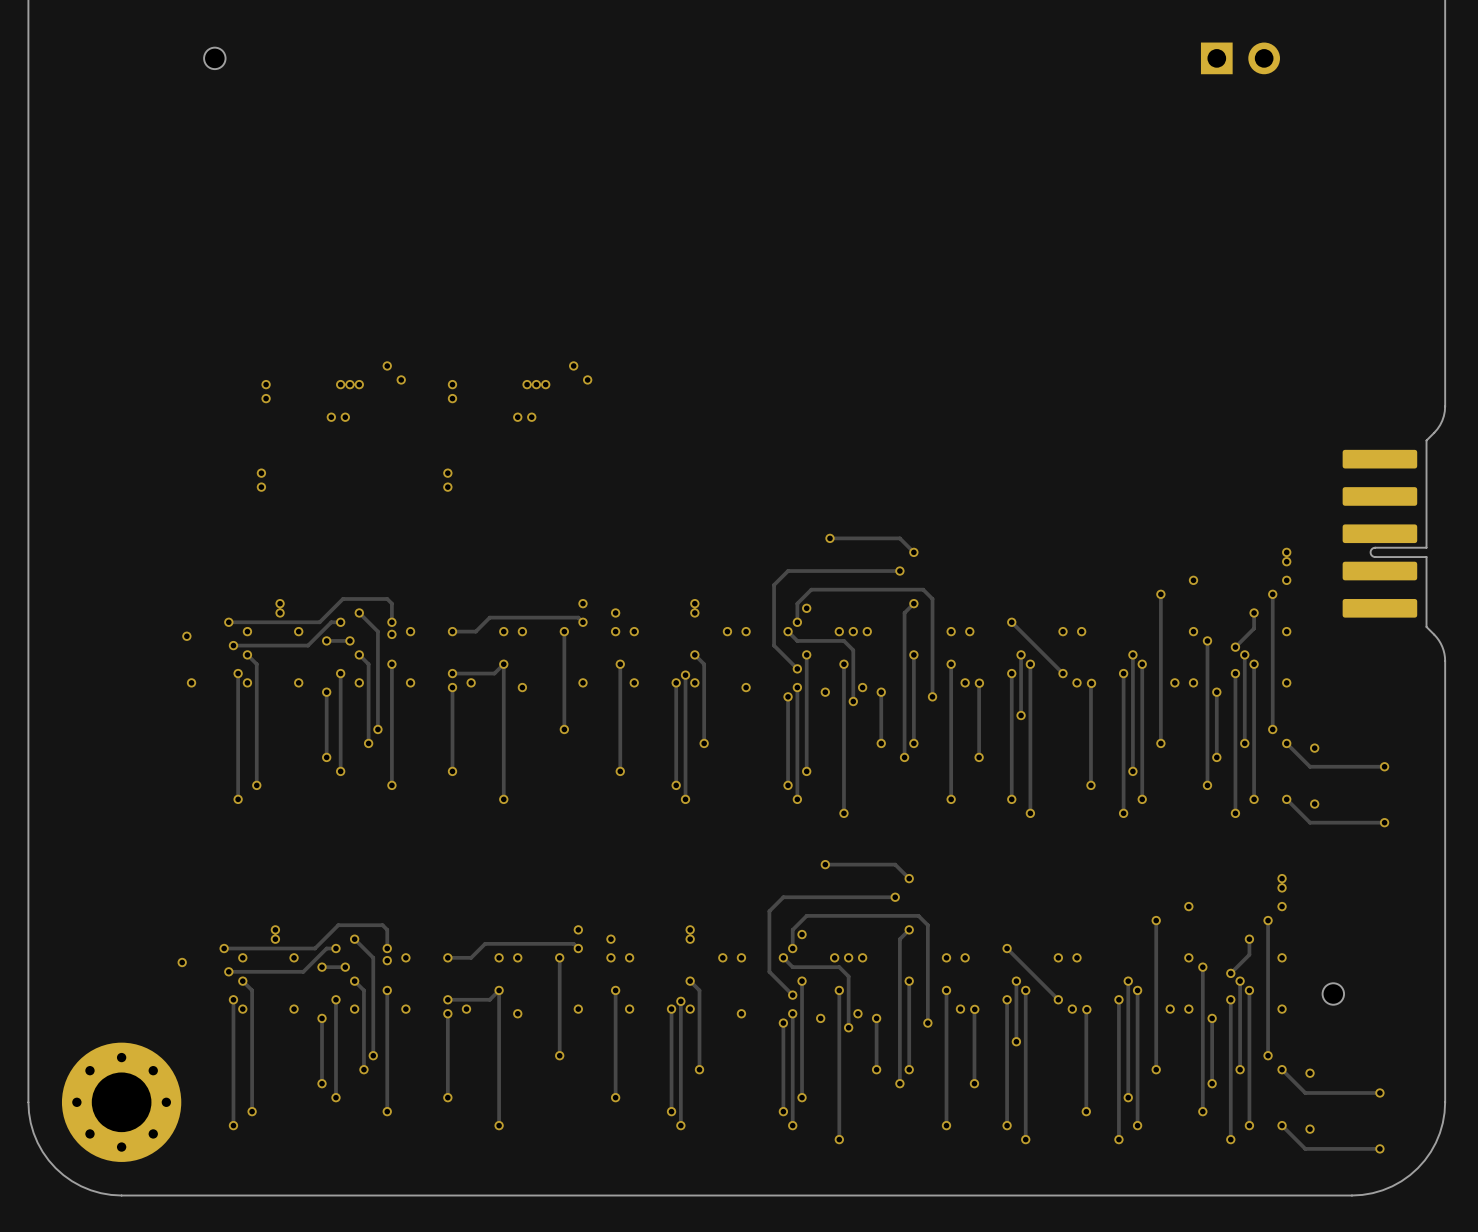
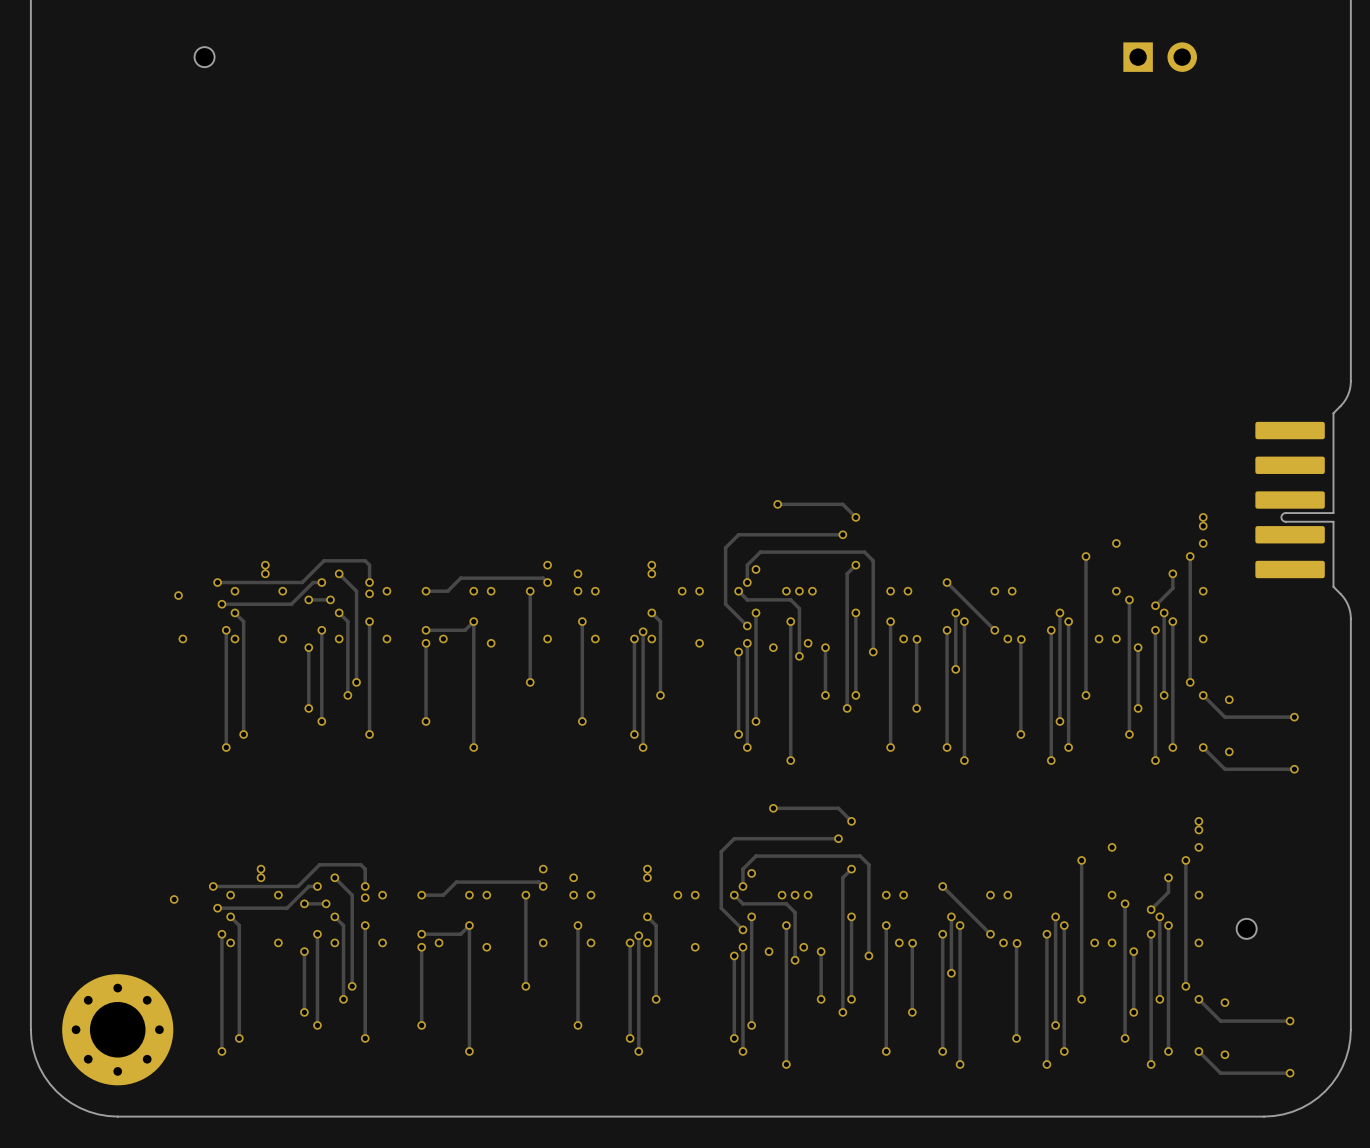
via: (387, 365) -> none
via: (573, 365) -> none
via: (401, 379) -> none
via: (587, 379) -> none
via: (266, 384) -> none
via: (340, 384) -> none
via: (349, 384) -> none
via: (359, 384) -> none
via: (452, 384) -> none
via: (527, 384) -> none
via: (536, 384) -> none
via: (545, 384) -> none
via: (266, 398) -> none
via: (452, 398) -> none
via: (331, 417) -> none
via: (345, 417) -> none
via: (517, 417) -> none
via: (531, 417) -> none
via: (261, 473) -> none
via: (447, 473) -> none
via: (261, 487) -> none
via: (447, 487) -> none

